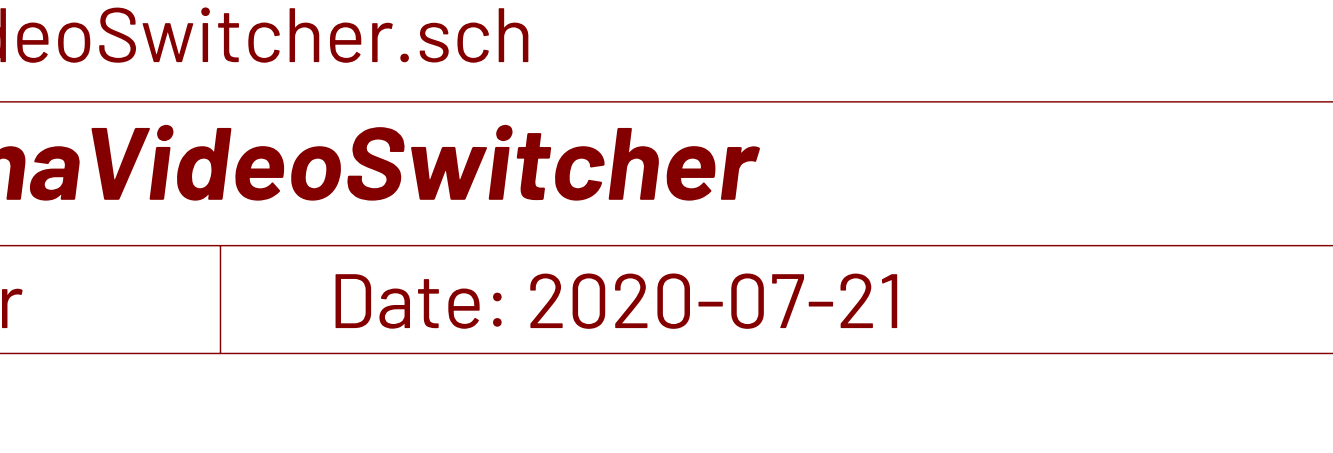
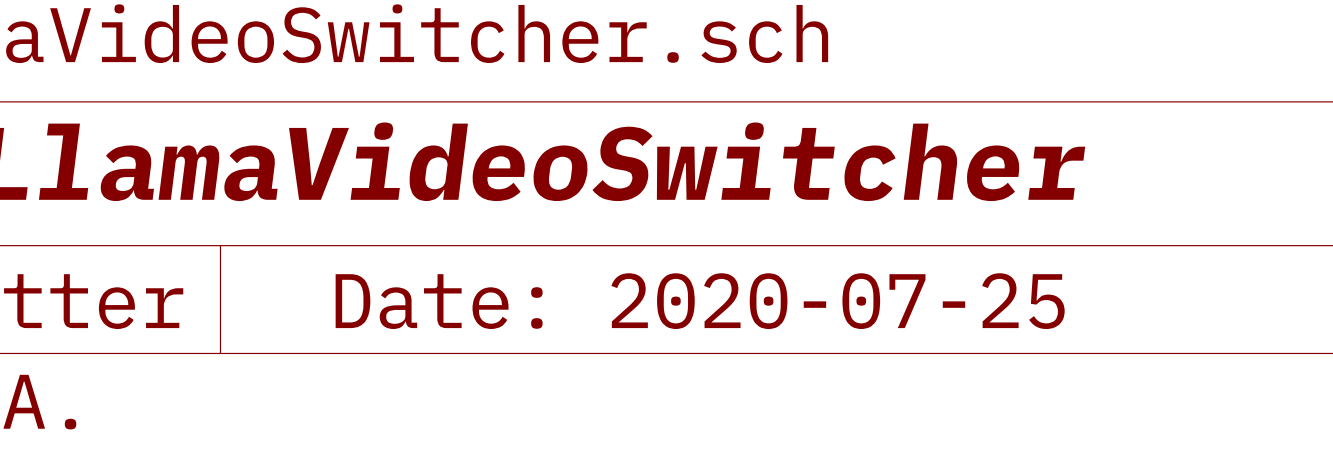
title block: Date: 2020-07-21 (616, 301) -> Date: 2020-07-25 (700, 301)

